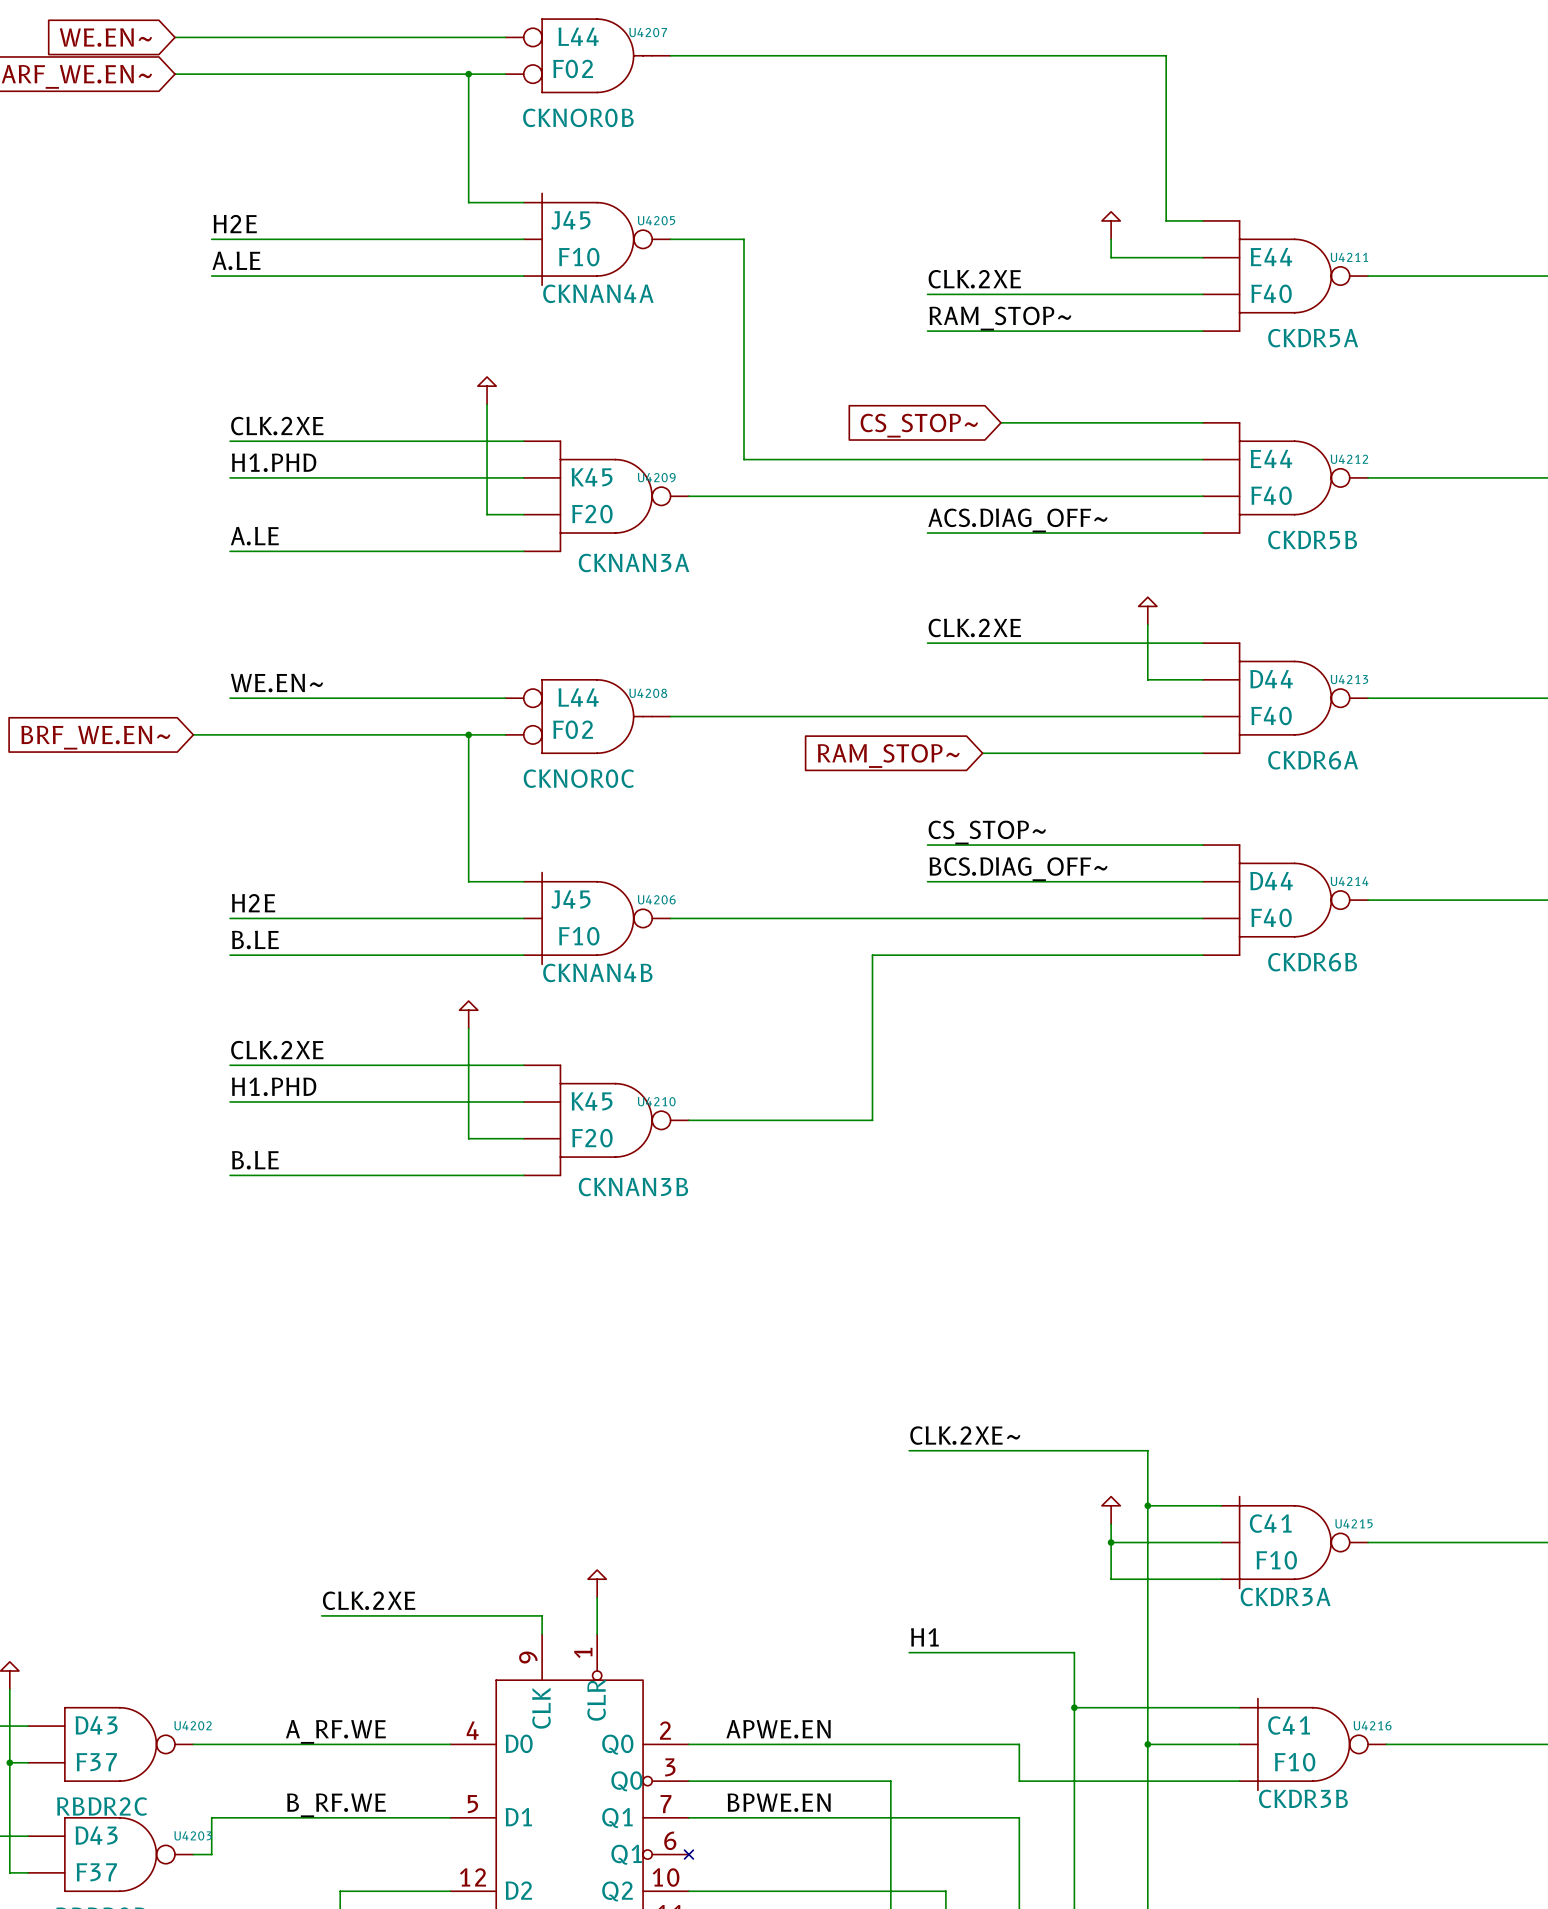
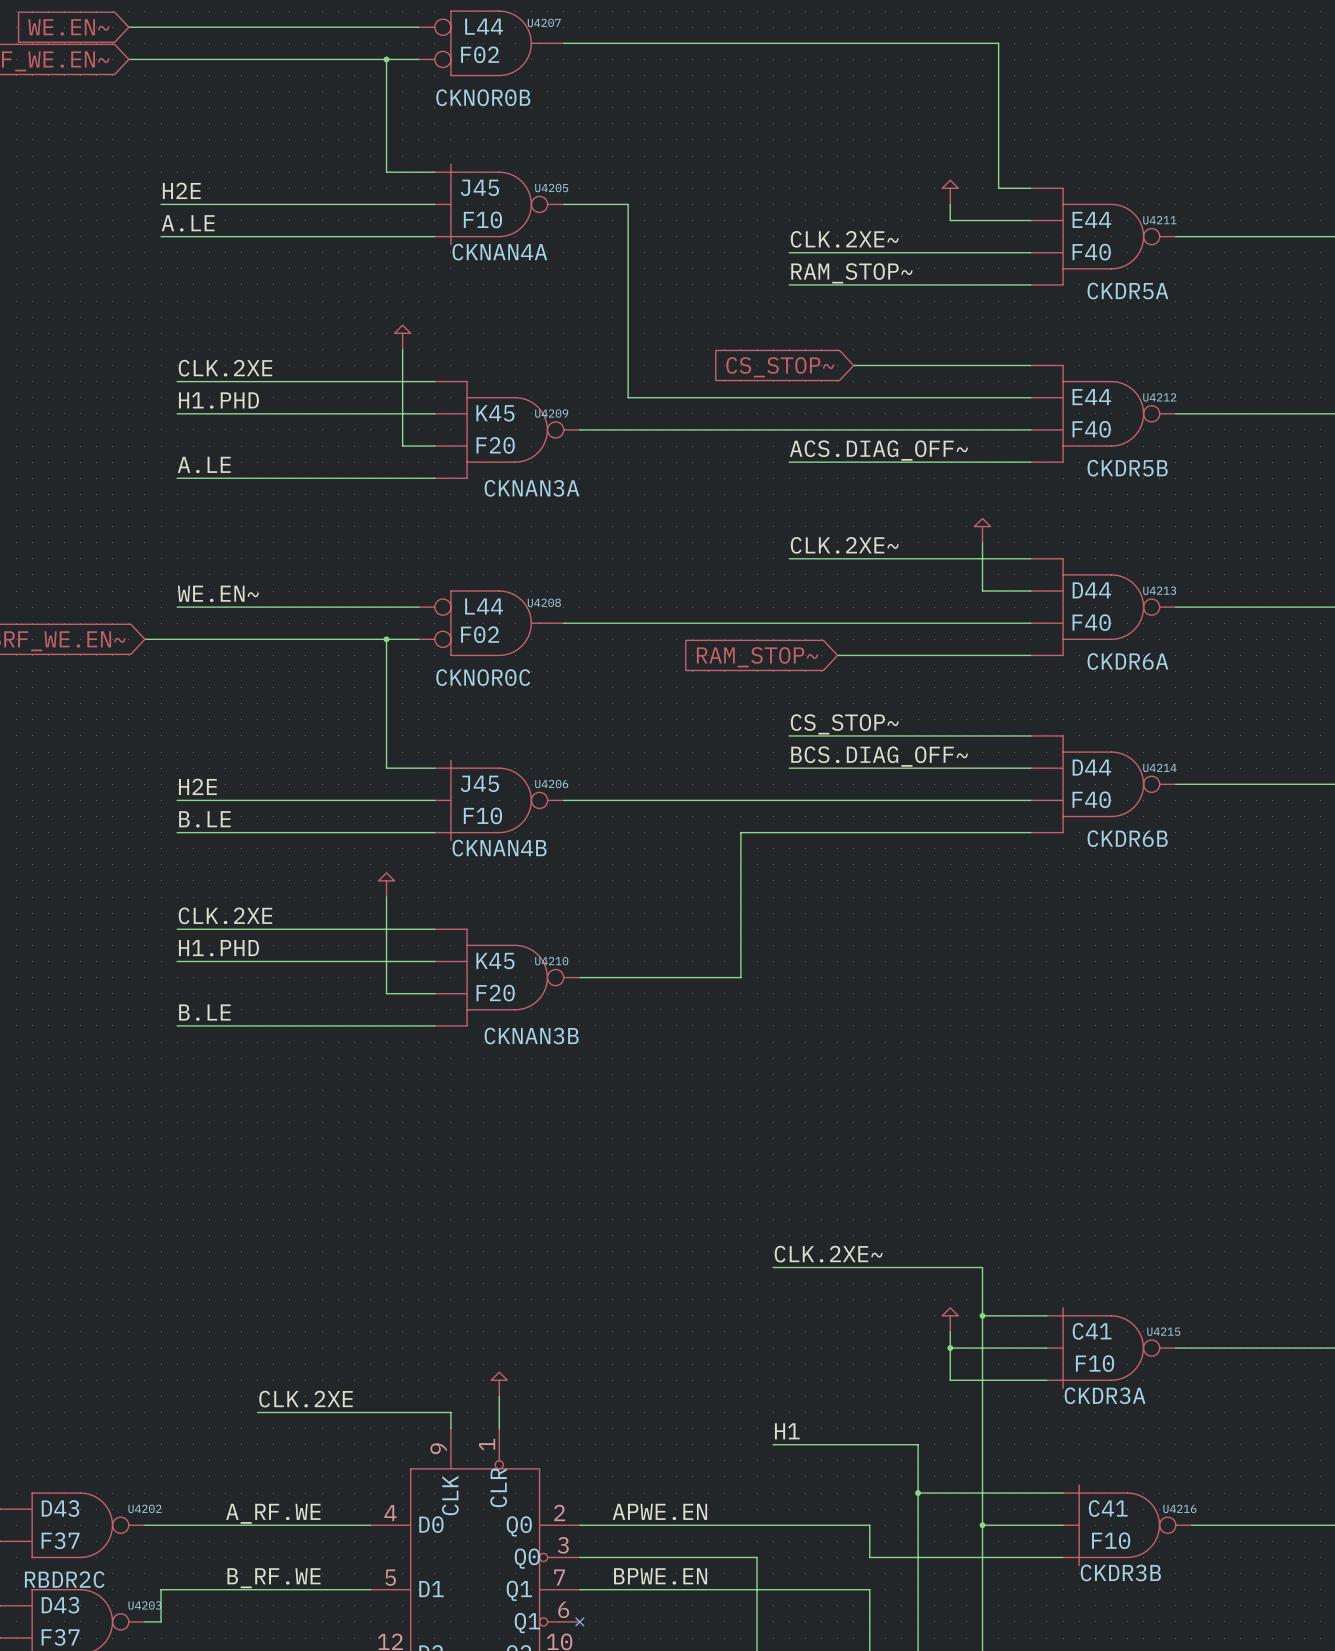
label: CLK.2XE (974, 279) -> CLK.2XE~ (844, 239)
label: CLK.2XE (974, 627) -> CLK.2XE~ (844, 545)

